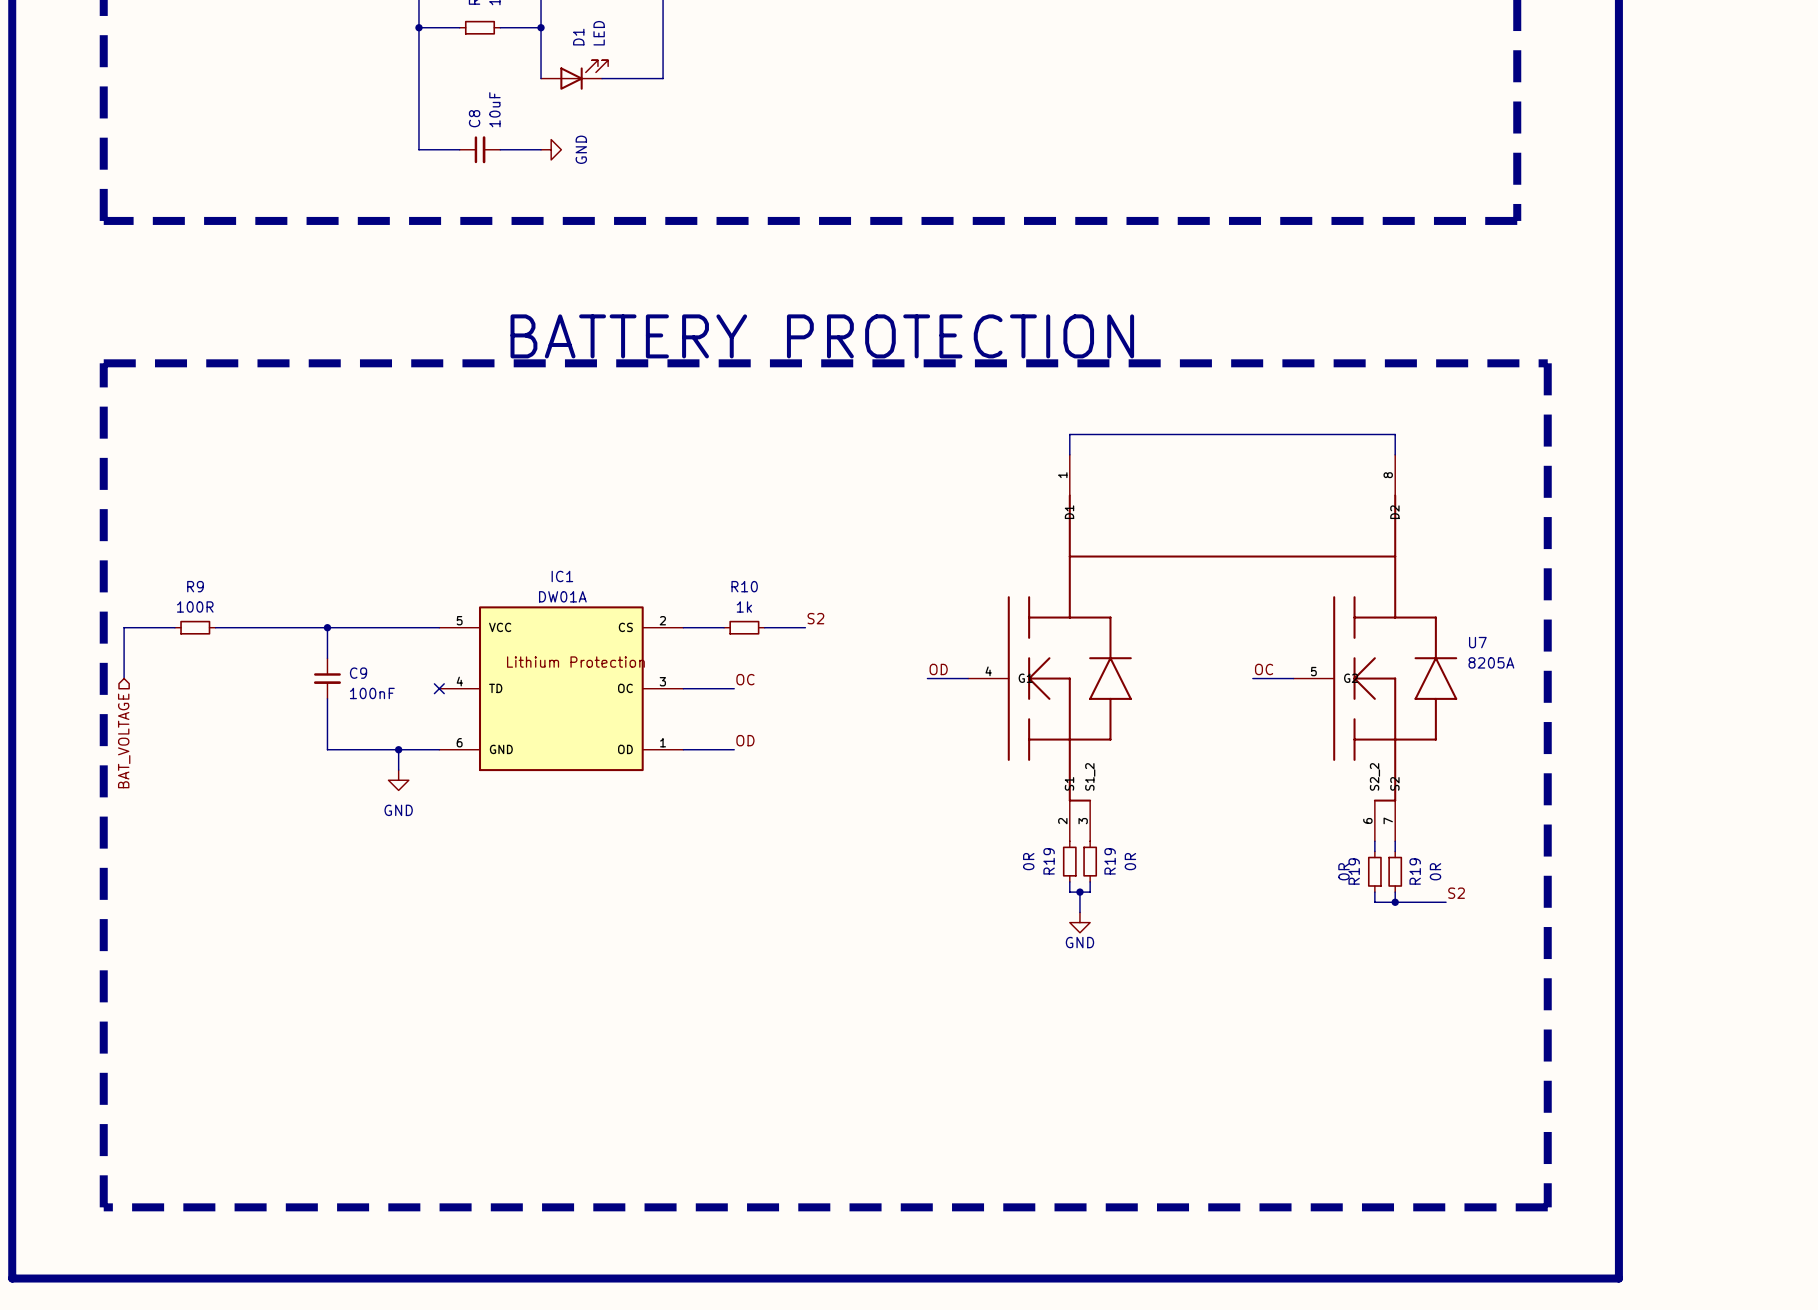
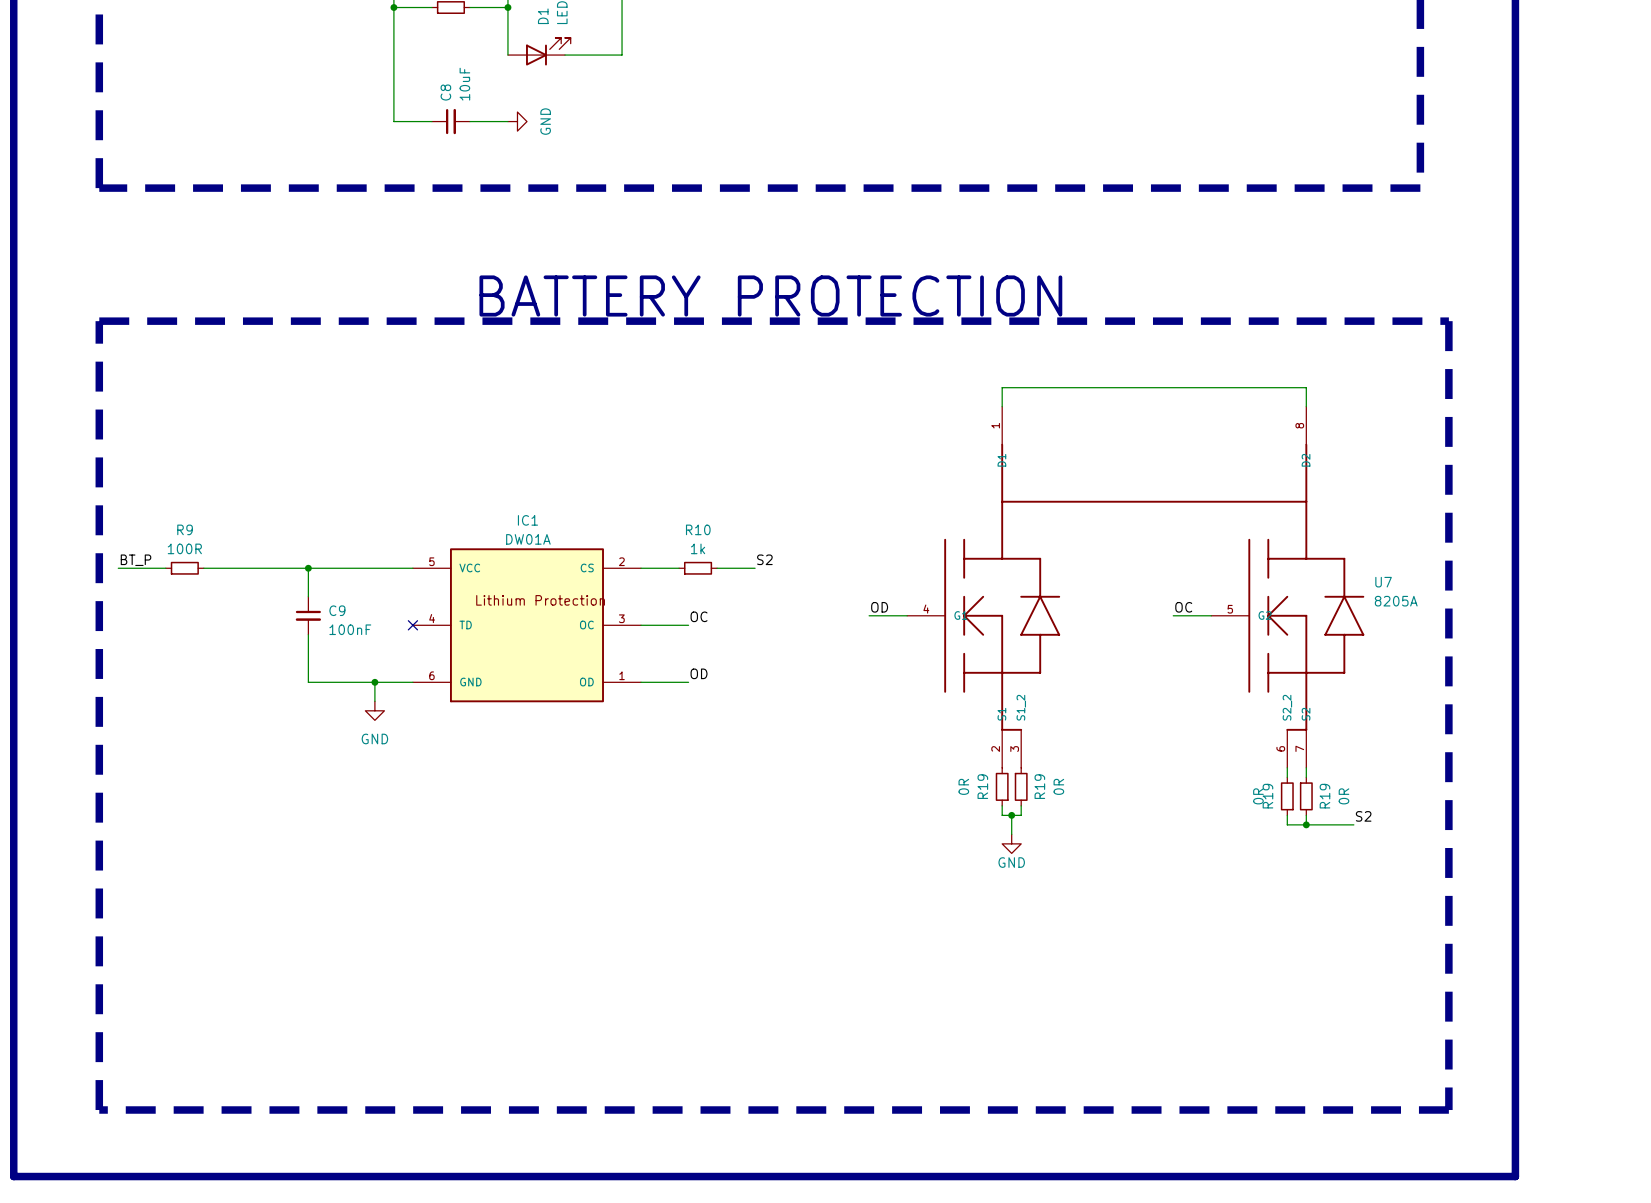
label: none -> BT_P (136, 560)
wire: (124, 627) (124, 678) -> none
hierarchical label: BAT_VOLTAGE (124, 740) -> none

